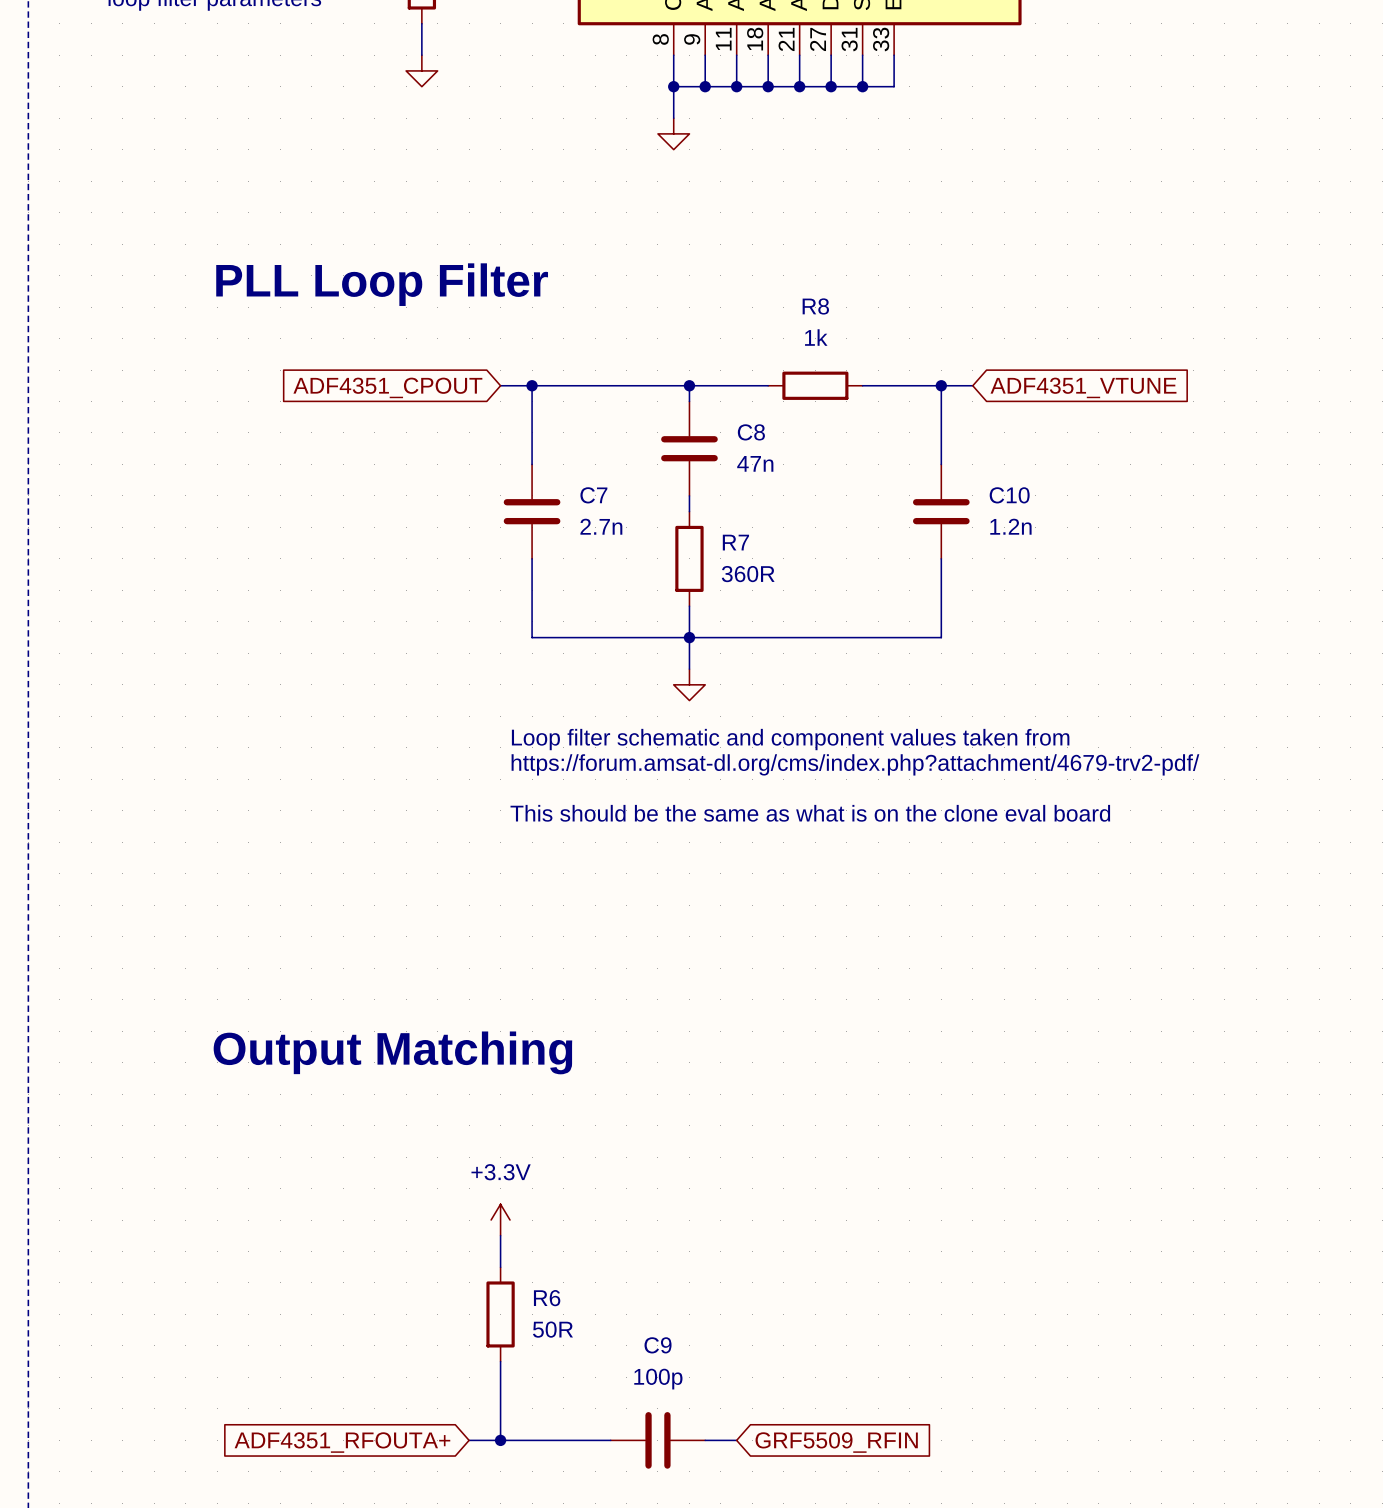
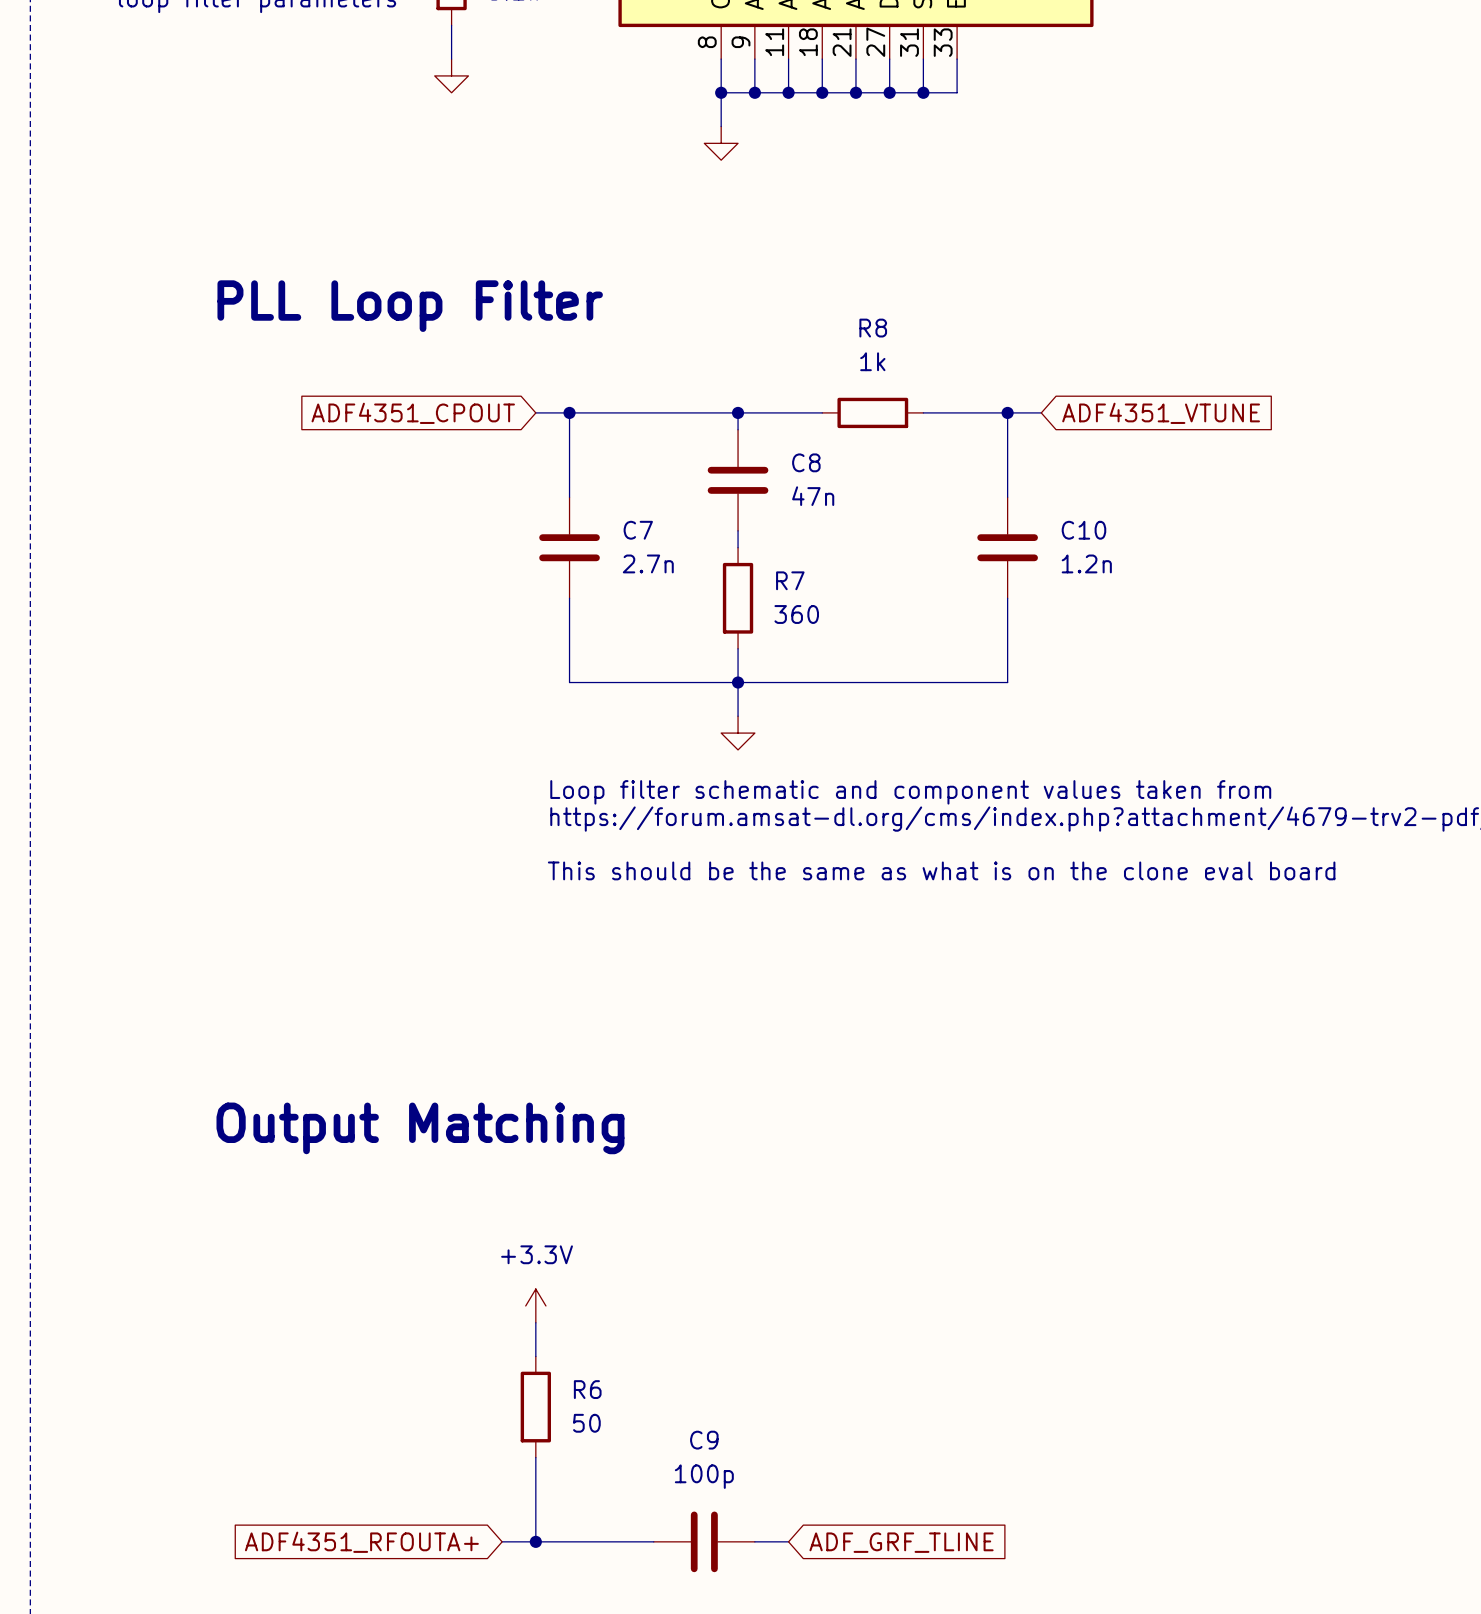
R7 value: 360R (748, 574) -> 360 (796, 614)
R6 value: 50R (552, 1329) -> 50 (586, 1423)
global label: GRF5509_RFIN (836, 1442) -> ADF_GRF_TLINE (901, 1542)

